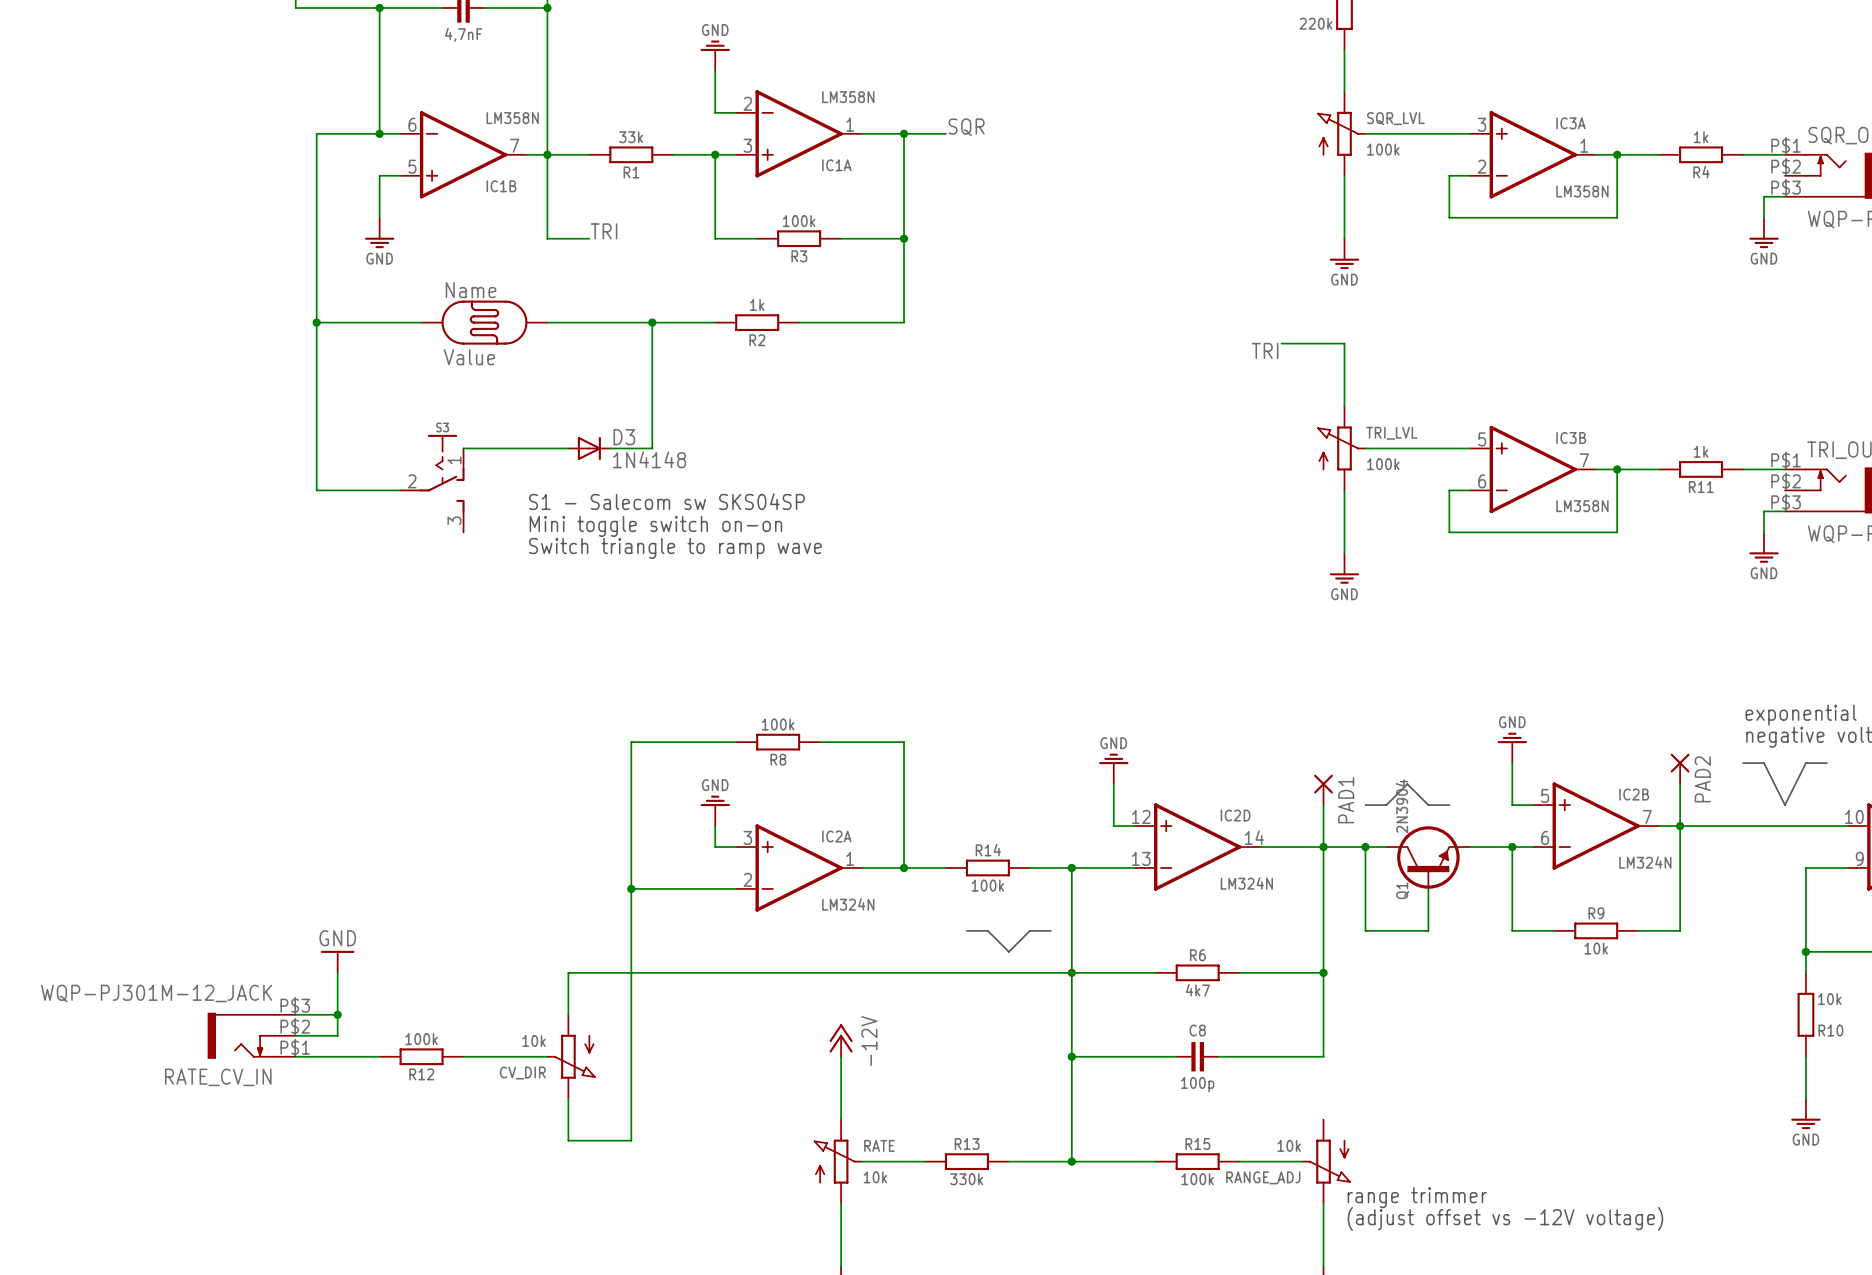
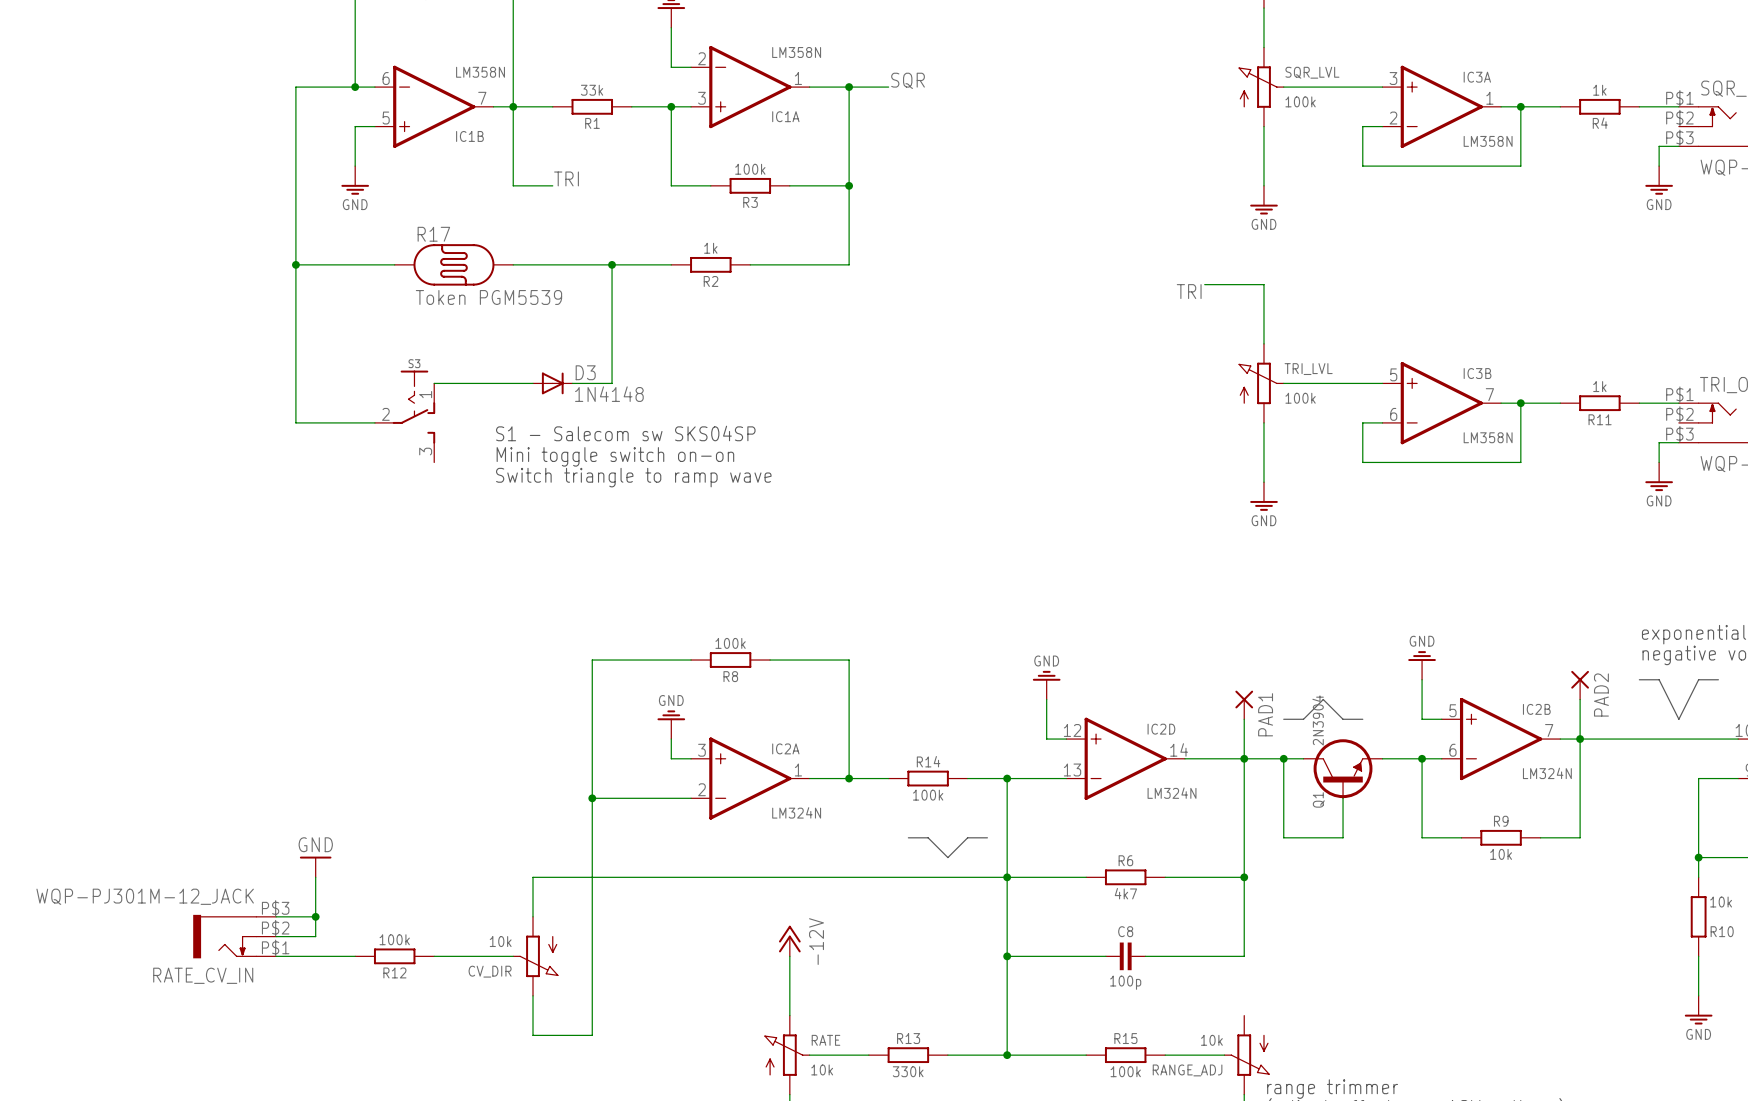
R17 name: none -> R17 (433, 234)
R17 text: Name (471, 290) -> none
R17 text: Value (469, 357) -> none
R17 value: none -> Token PGM5539 (488, 297)

